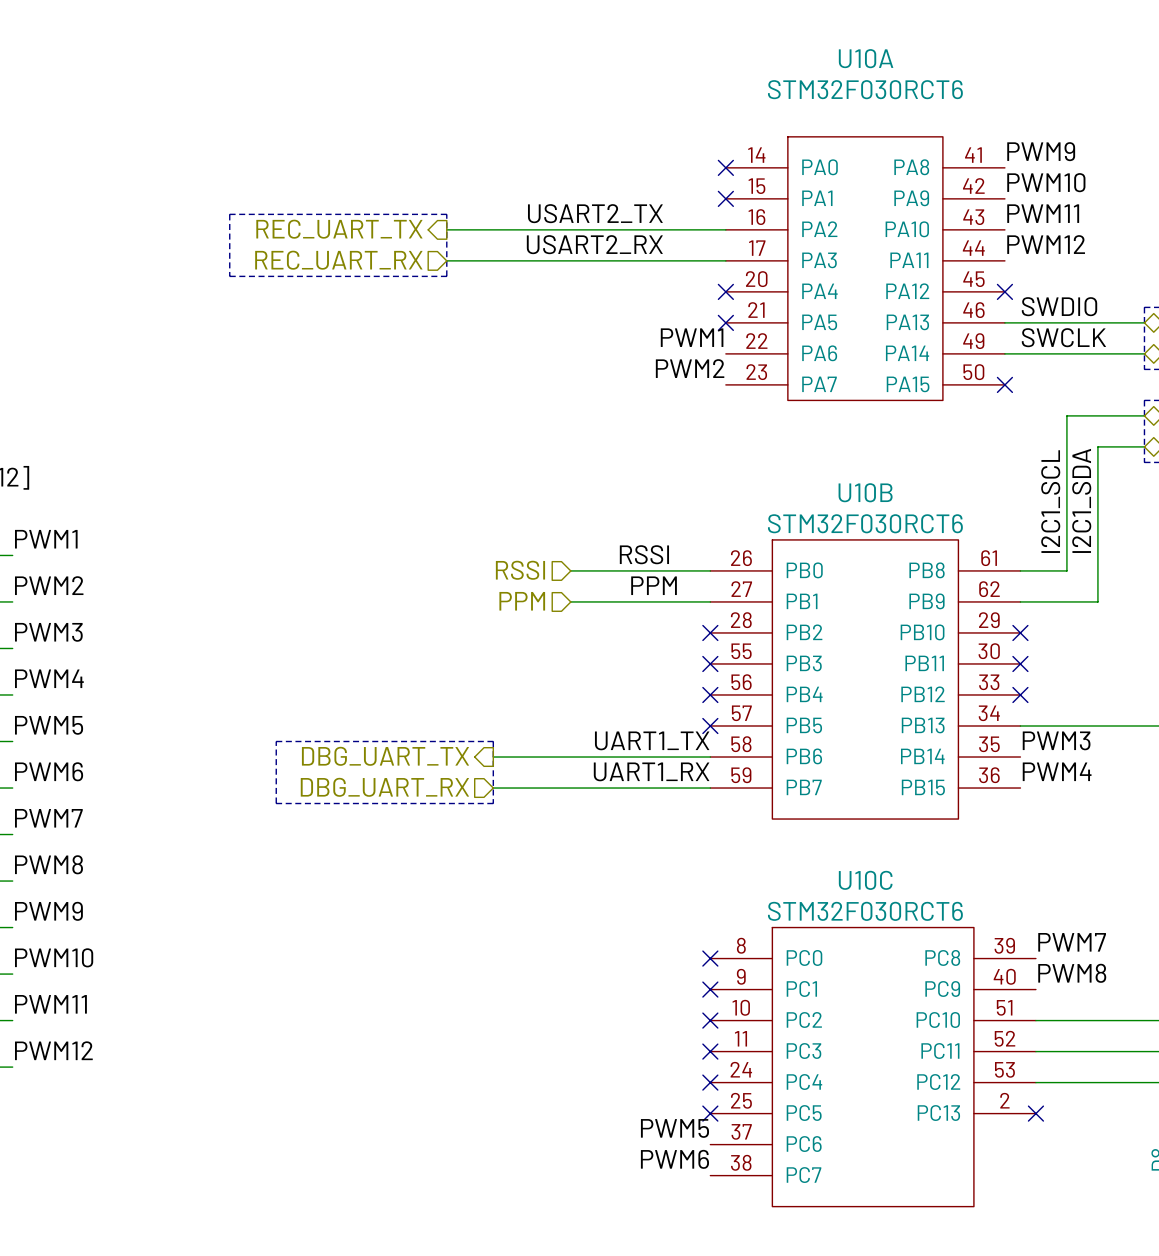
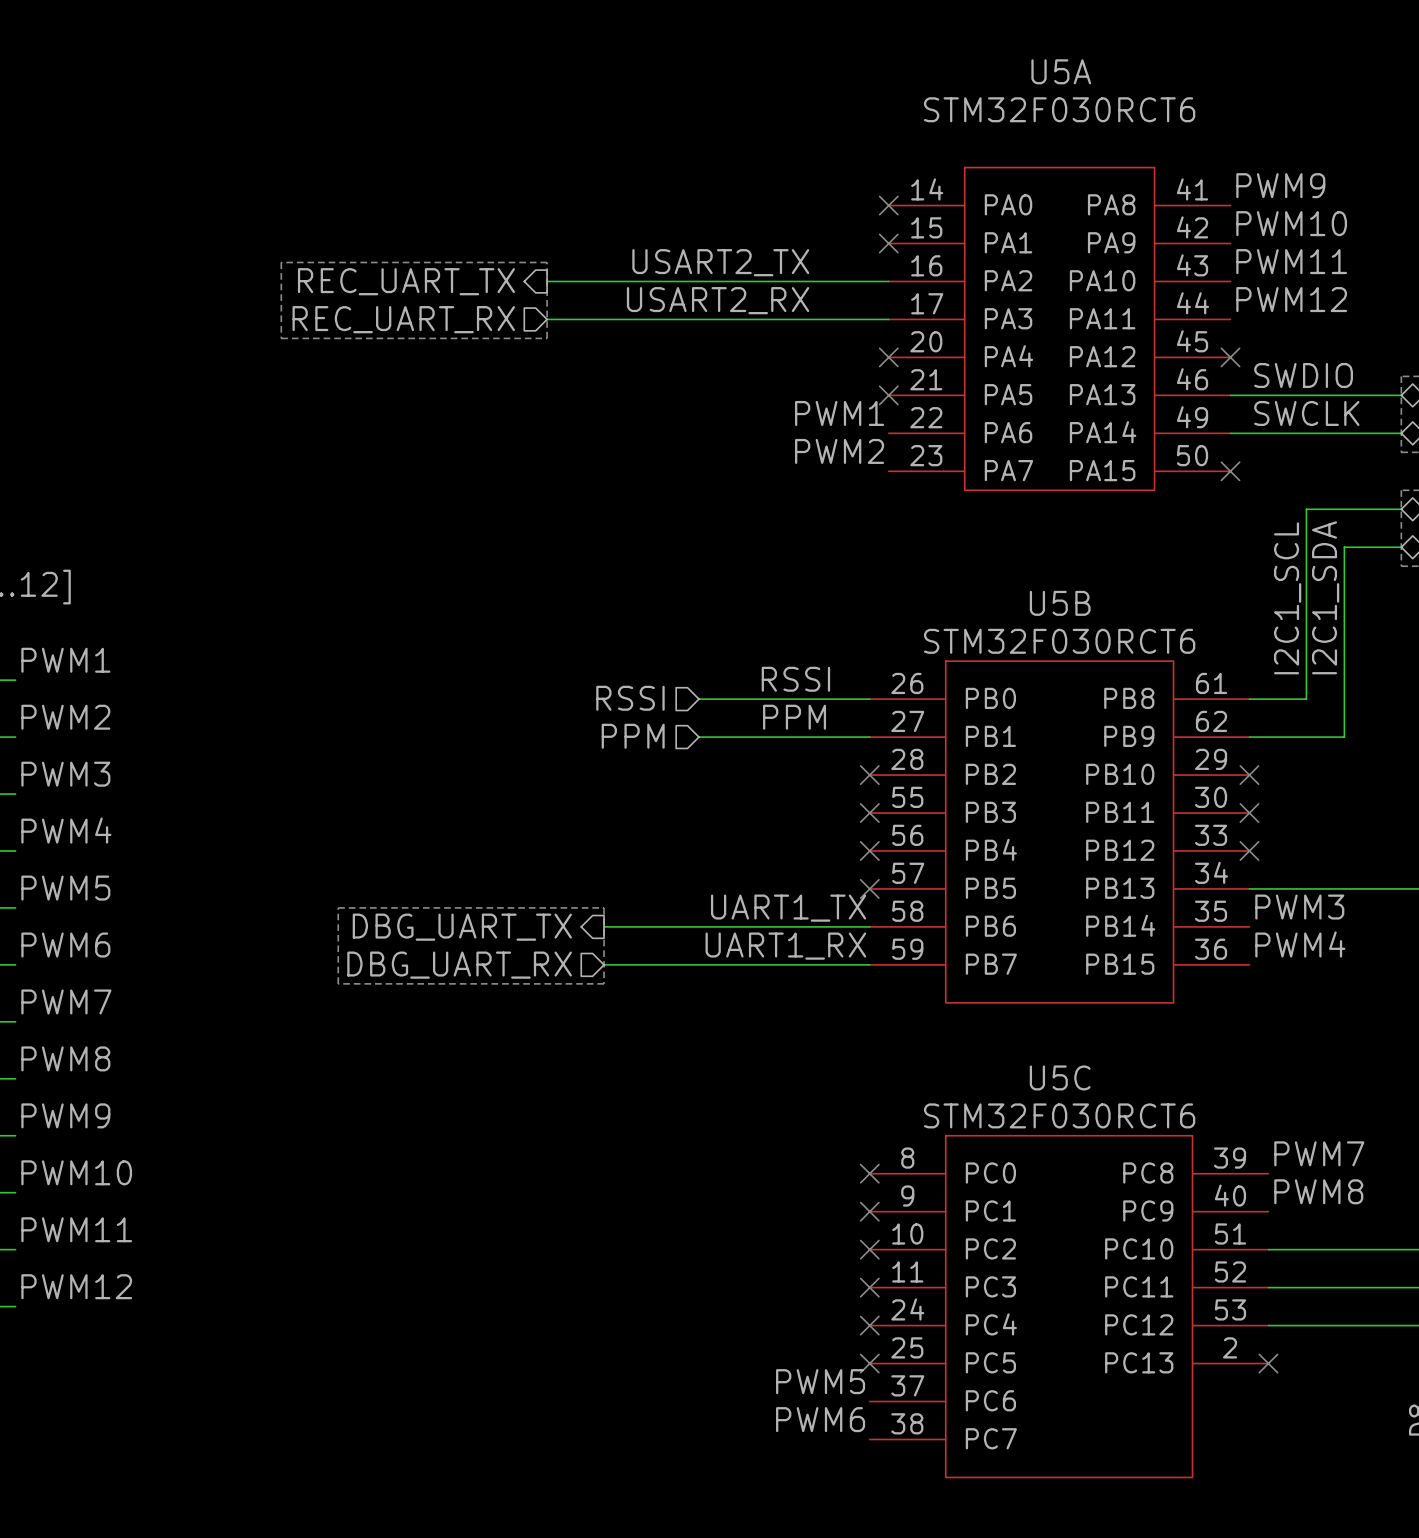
U10A name: U10A (866, 58) -> U5A (1061, 71)
U10B name: U10B (865, 492) -> U5B (1060, 603)
U10C name: U10C (865, 880) -> U5C (1060, 1077)

